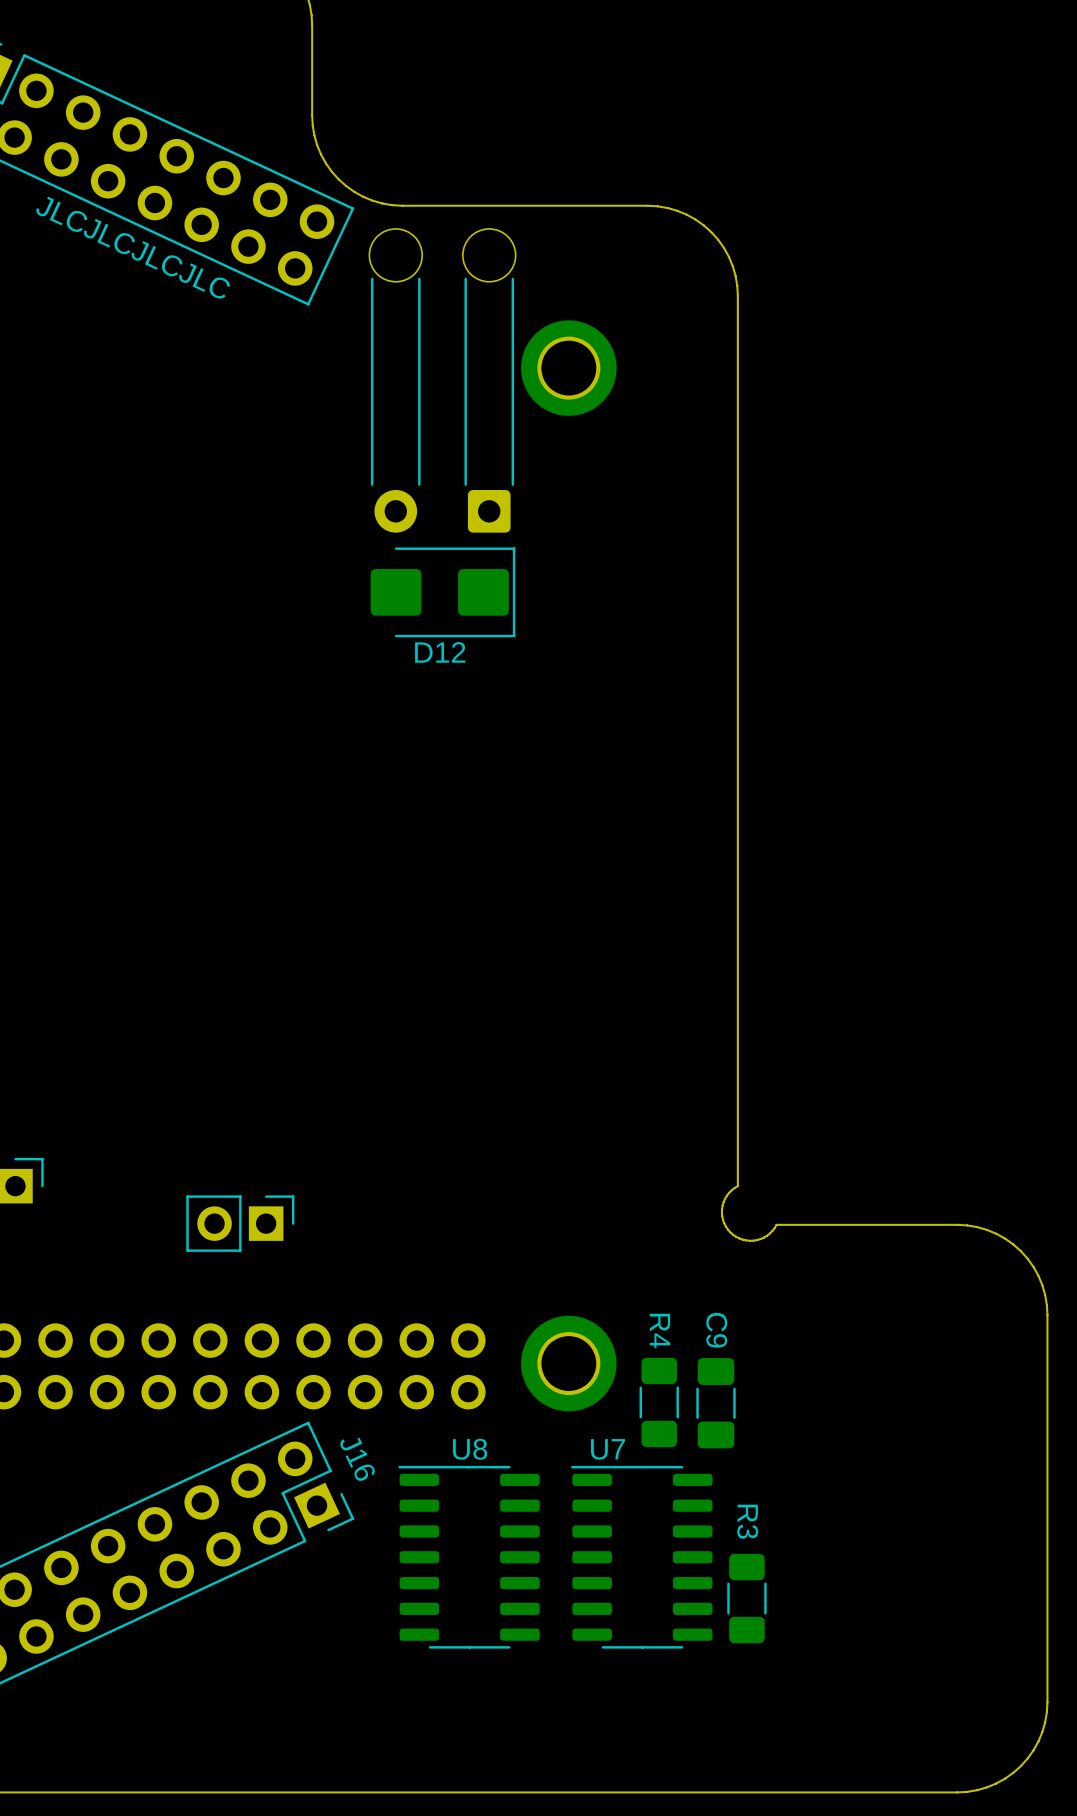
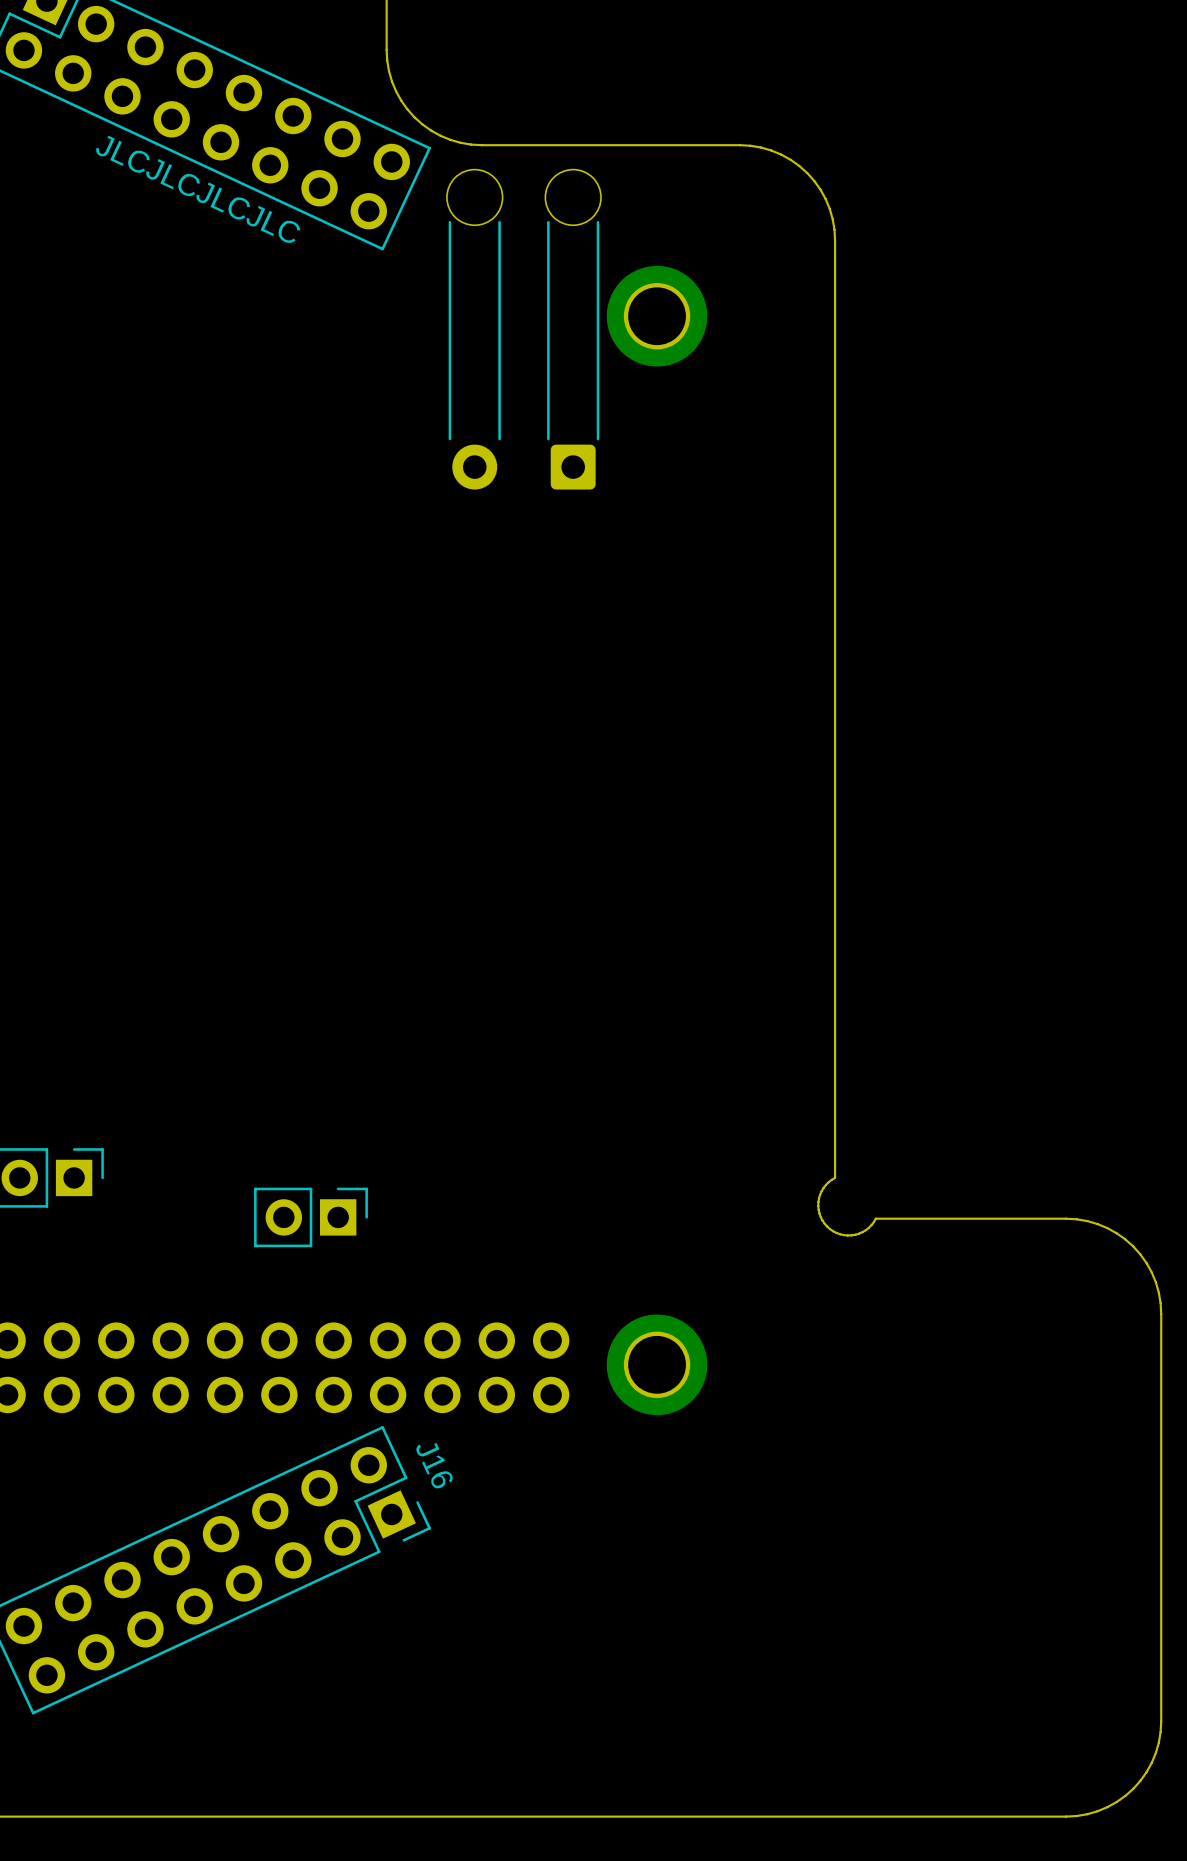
D12: (443, 592) -> none
R4: (659, 1402) -> none
C9: (716, 1403) -> none
U8: (469, 1557) -> none
U7: (641, 1557) -> none
R3: (746, 1598) -> none

